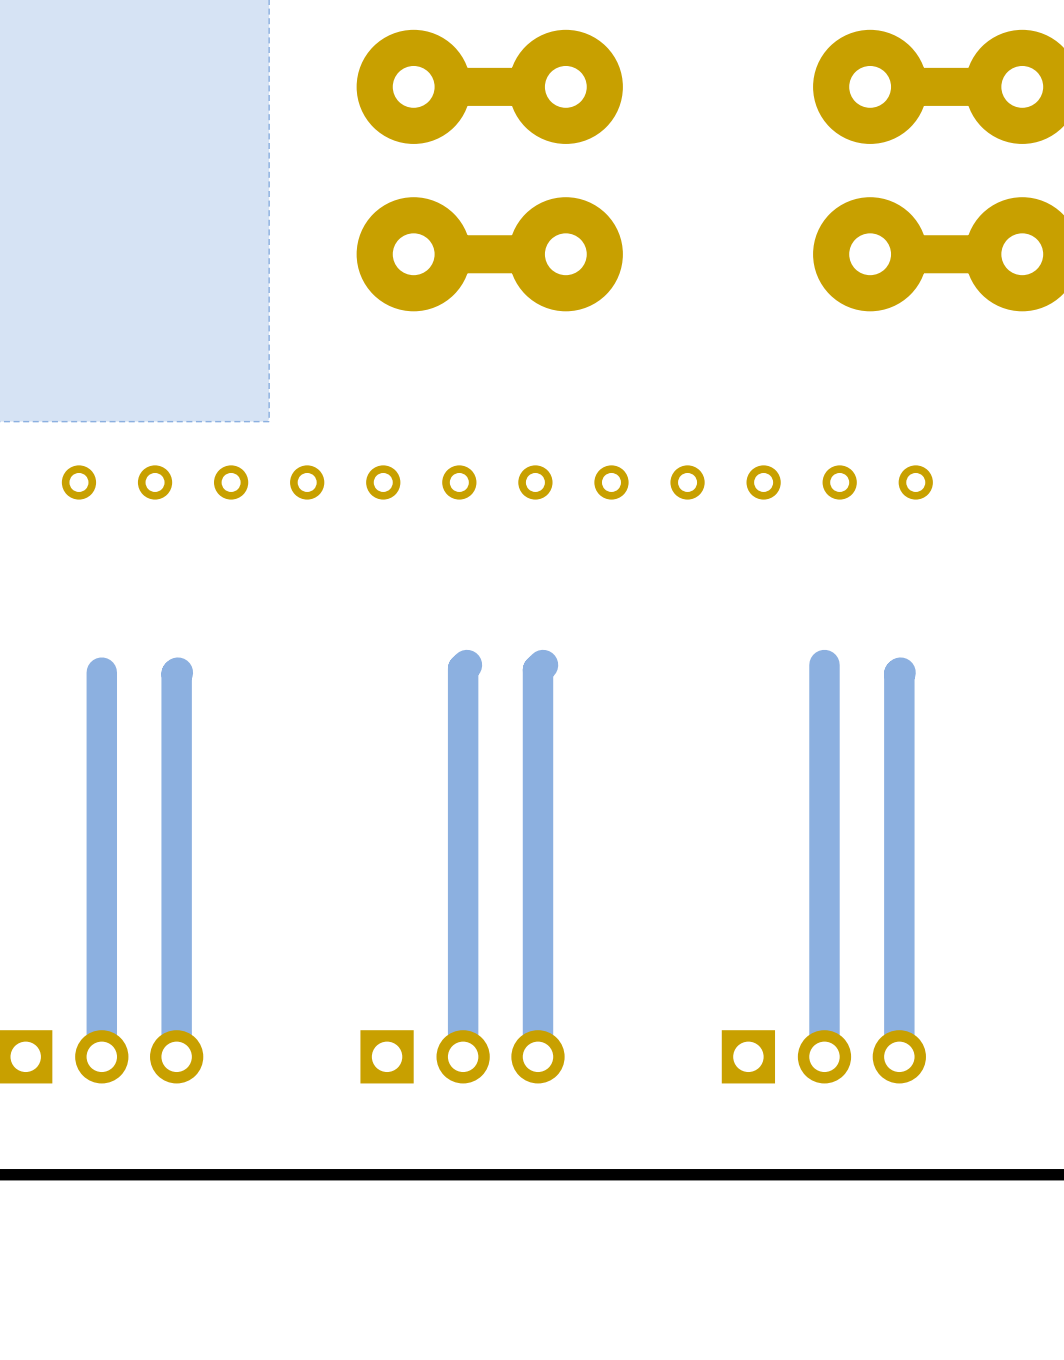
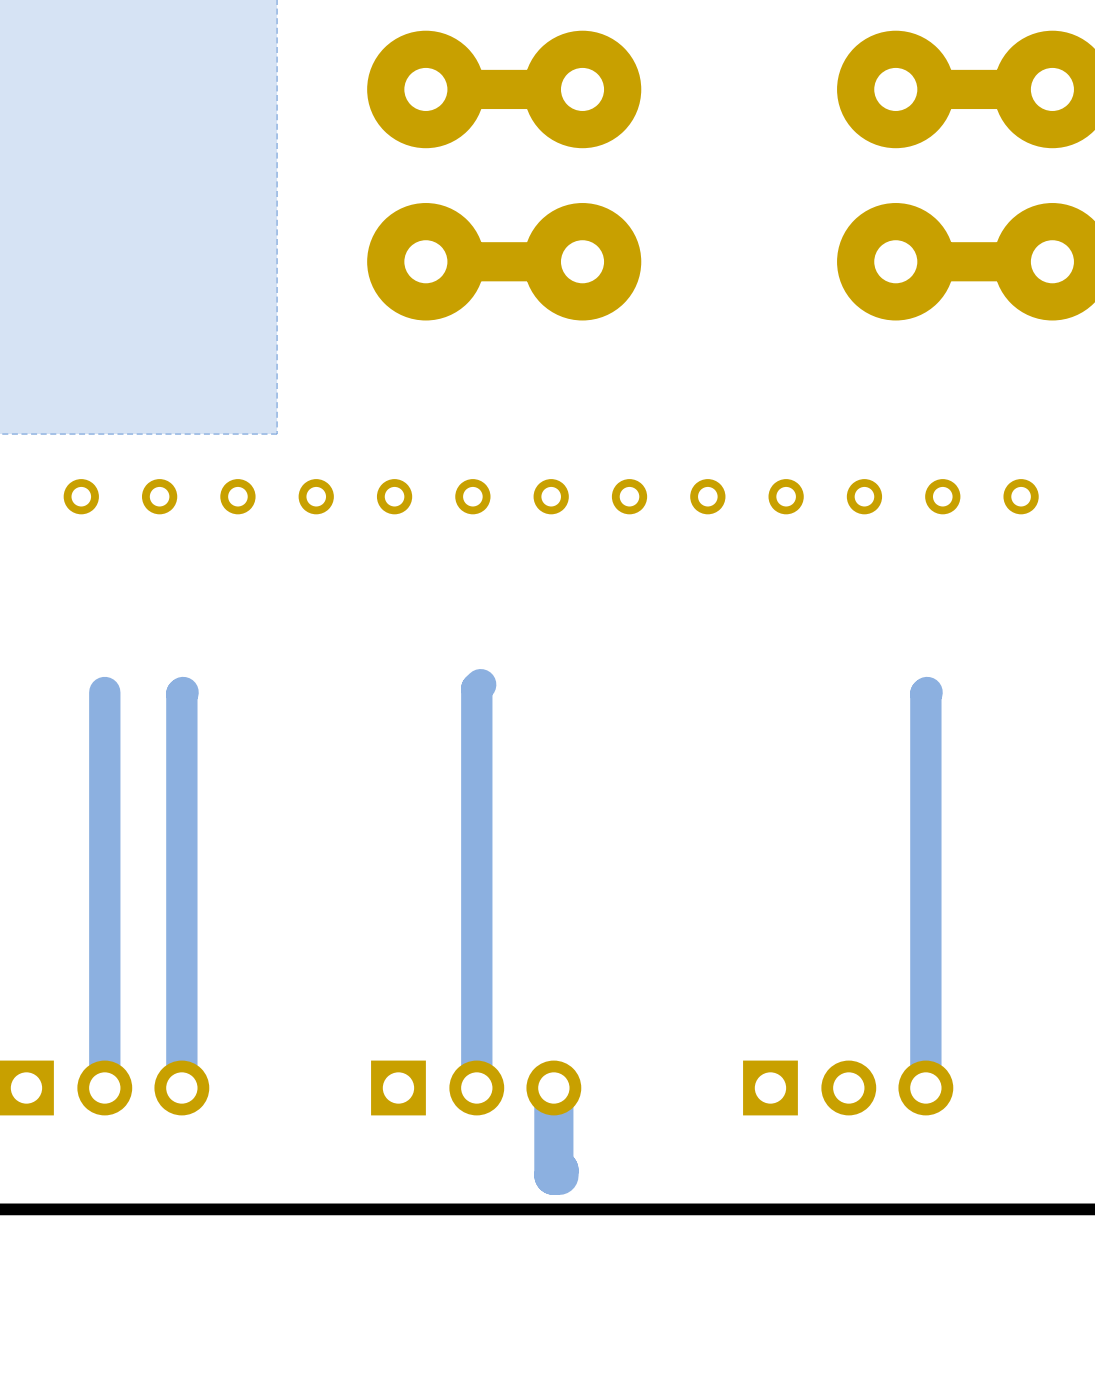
part: none -> (1021, 496)
track: (543, 665) (537, 670) (537, 1056) -> (559, 1175) (559, 1170) (553, 1175) (553, 1087)
track: (824, 665) (824, 1056) -> none

